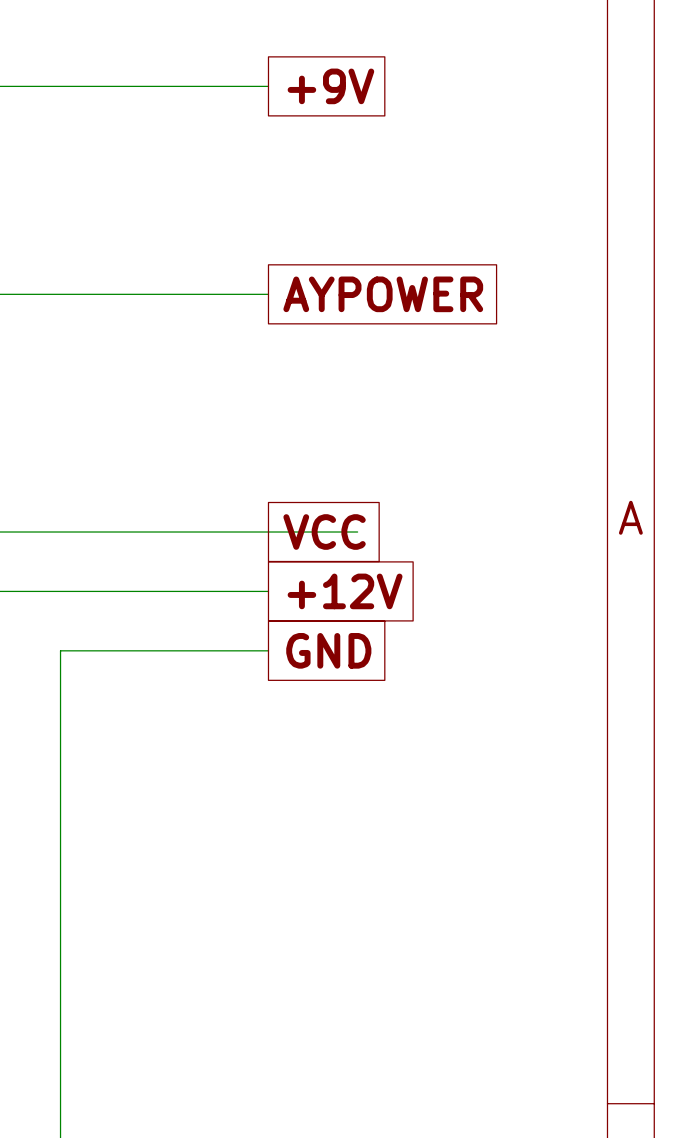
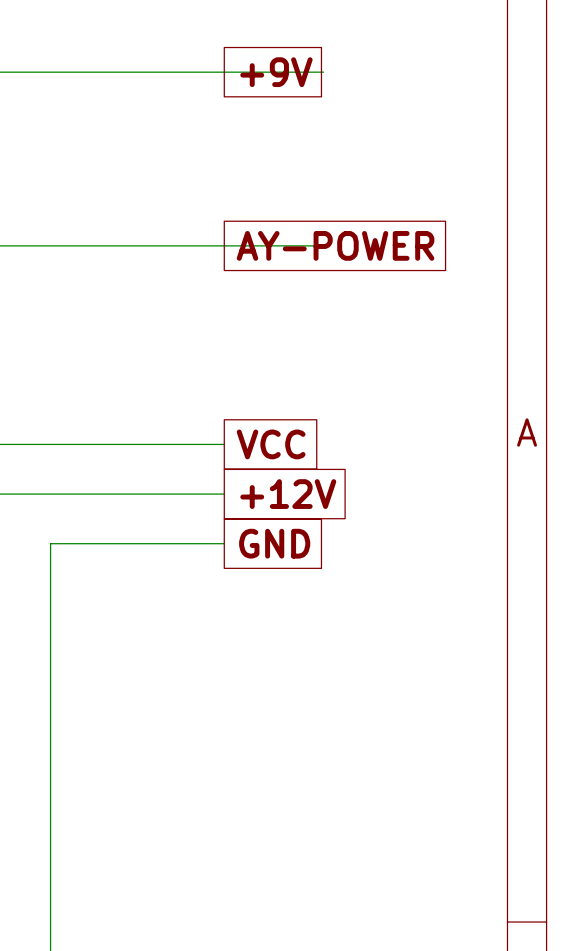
wire: none -> (224, 72) (323, 72)
wire: none -> (224, 245) (323, 245)
global label: AYPOWER (383, 294) -> AY-POWER (335, 245)
wire: (268, 532) (357, 532) -> none

